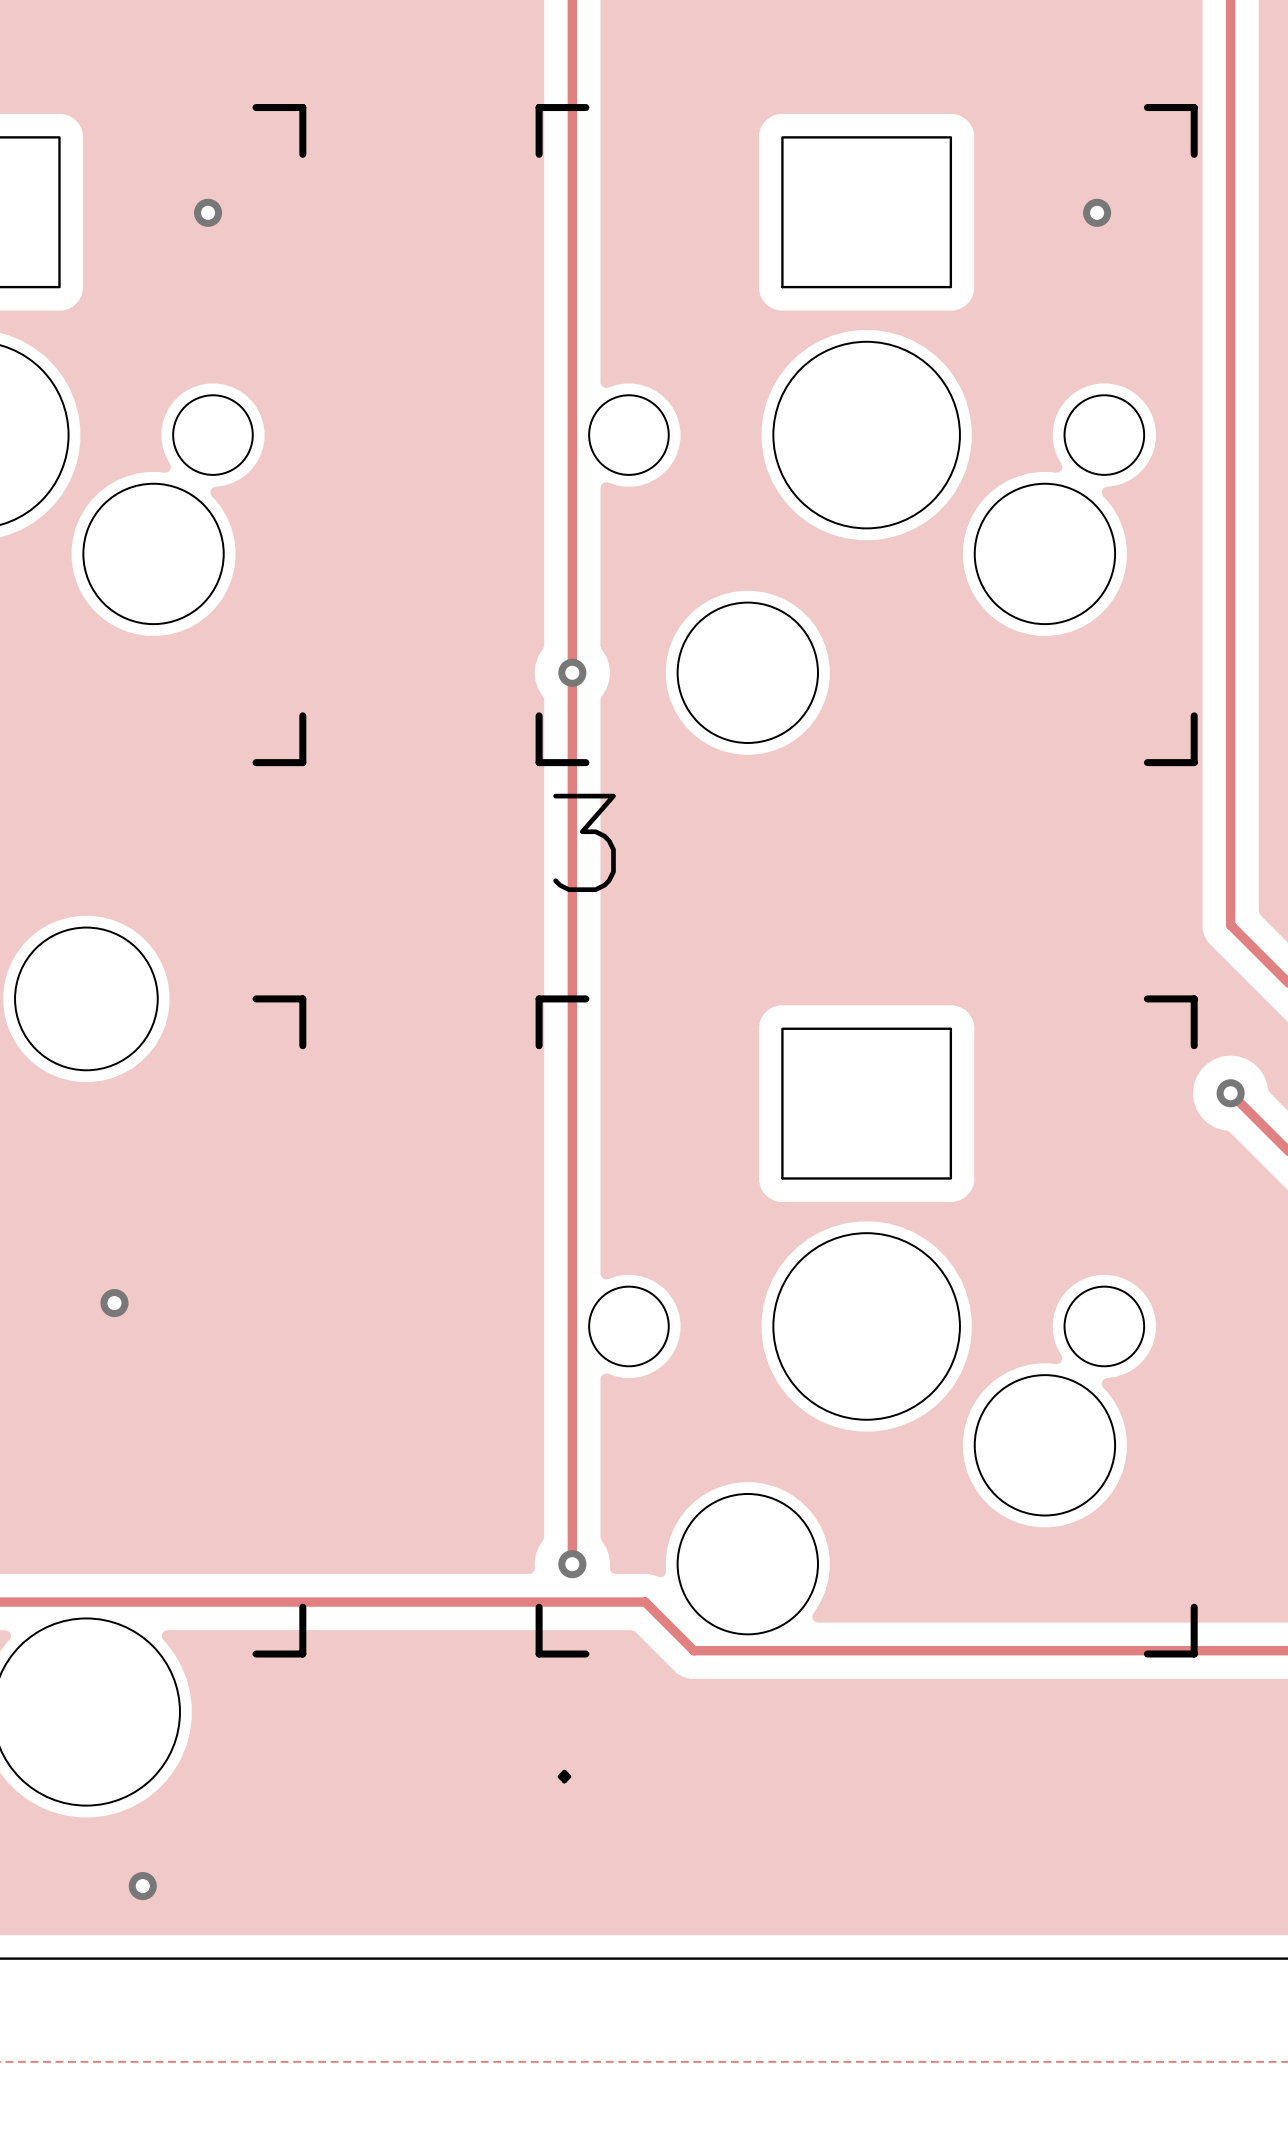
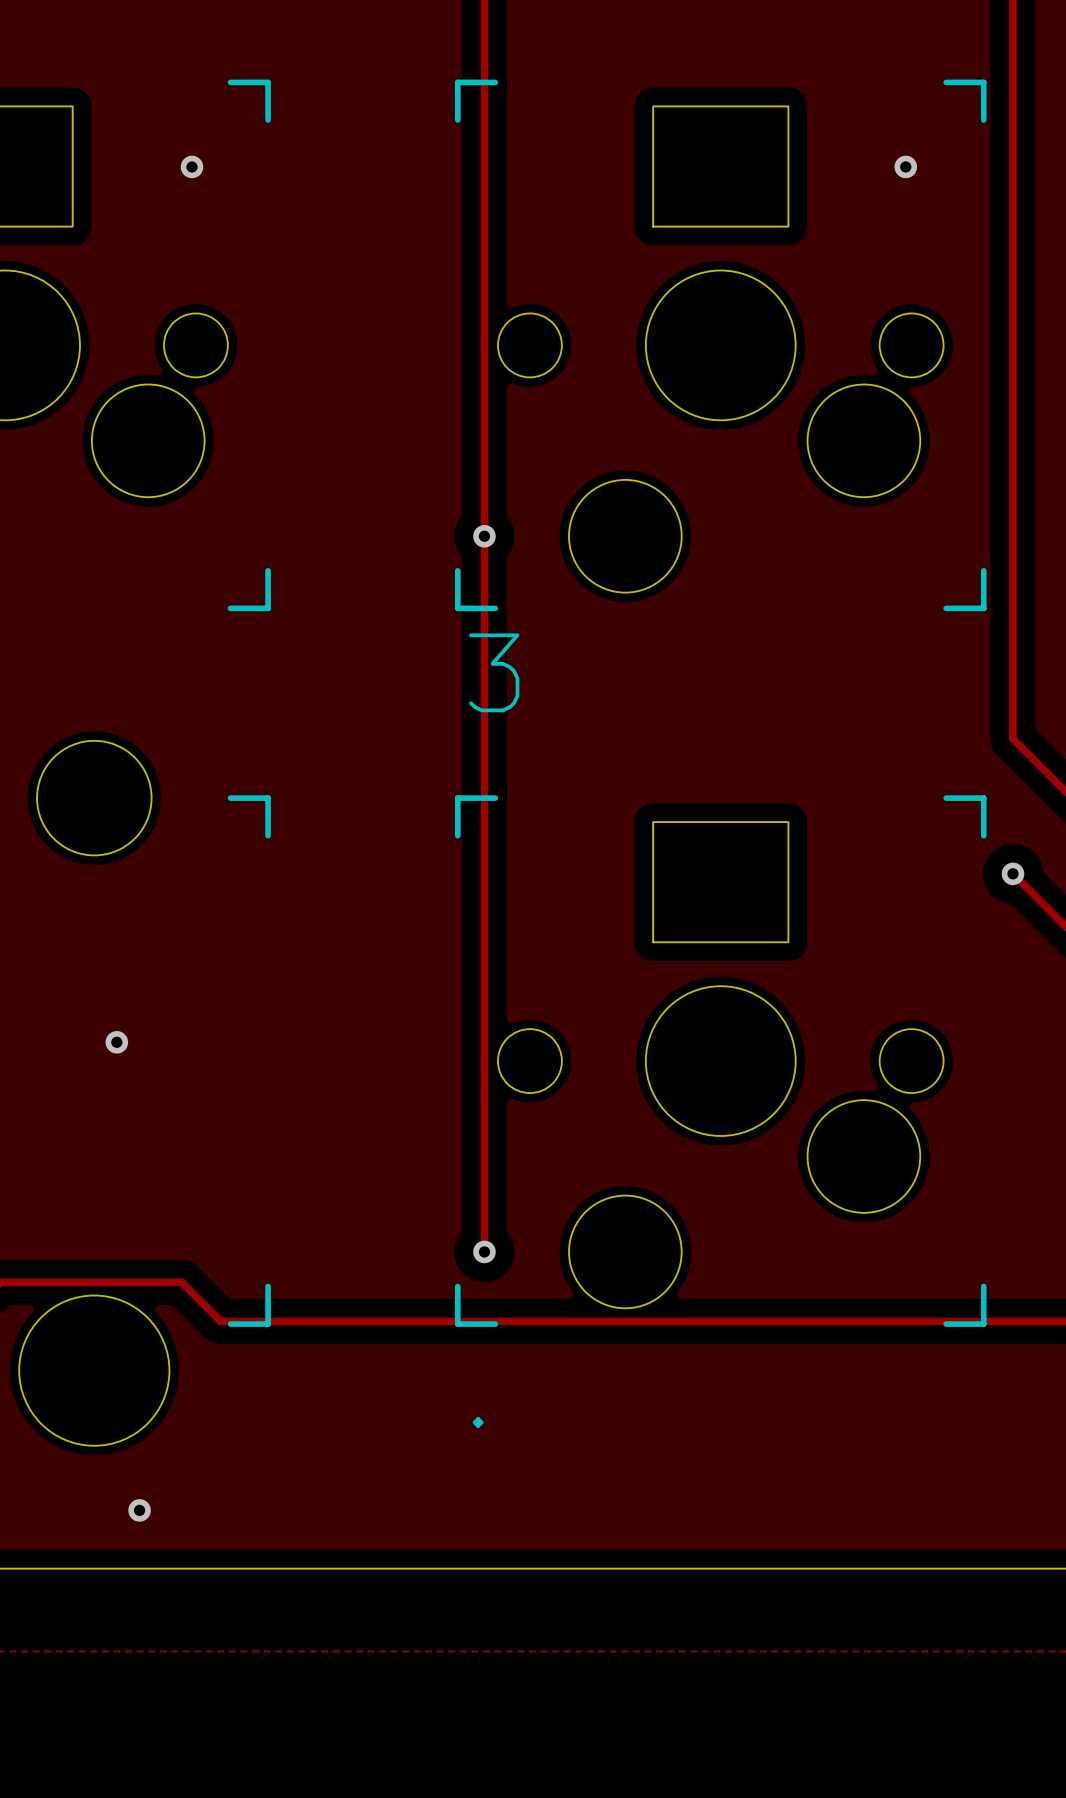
track: (195, 1602) (645, 1602) (693, 1650) -> (181, 1282) (220, 1321) (582, 1321)

